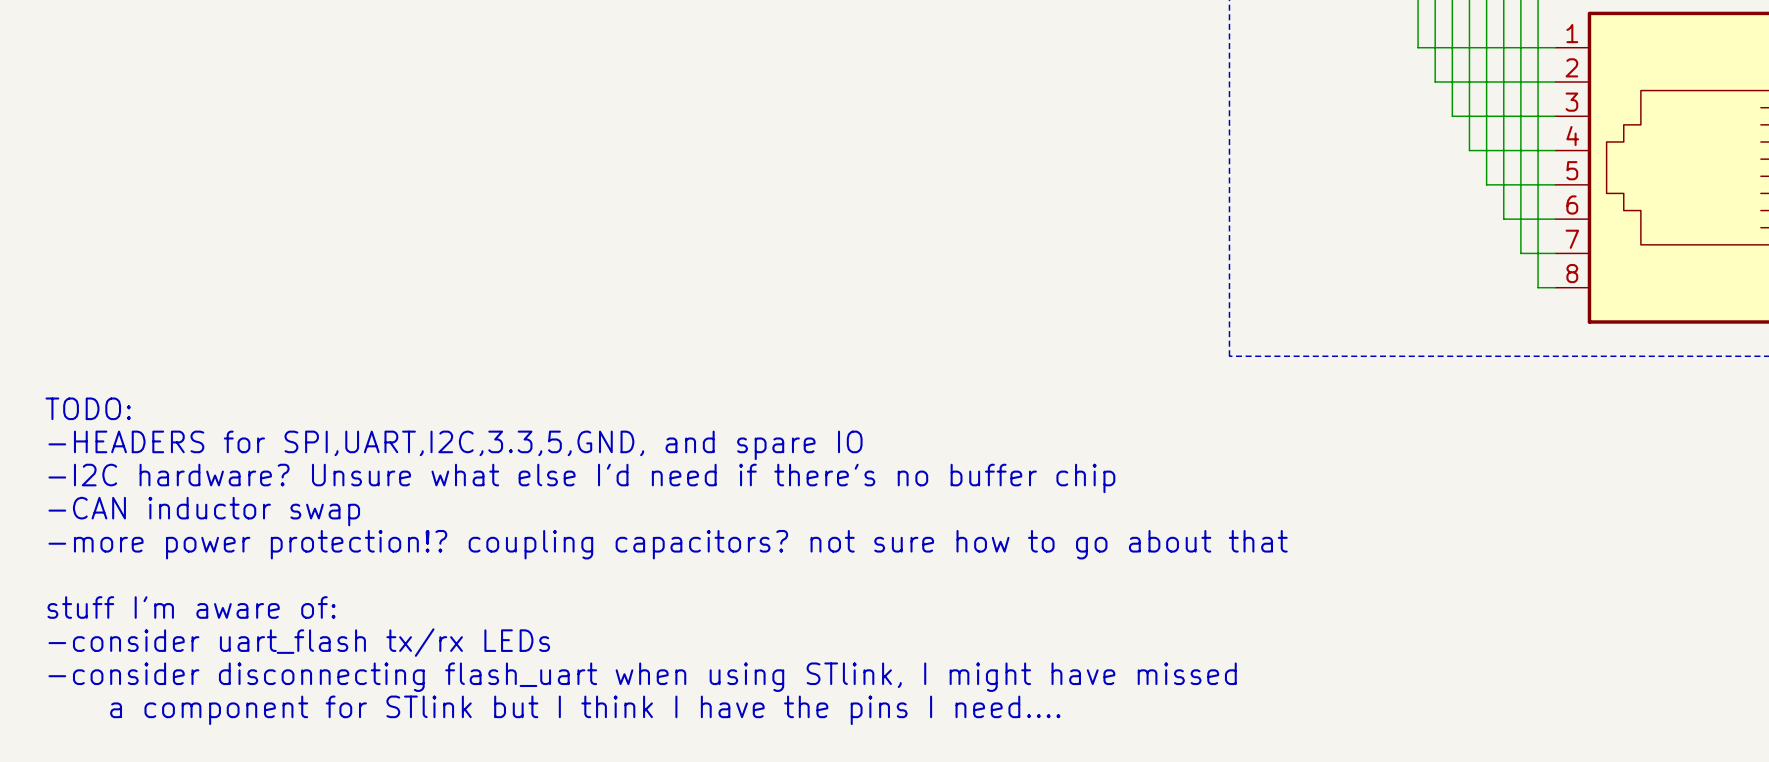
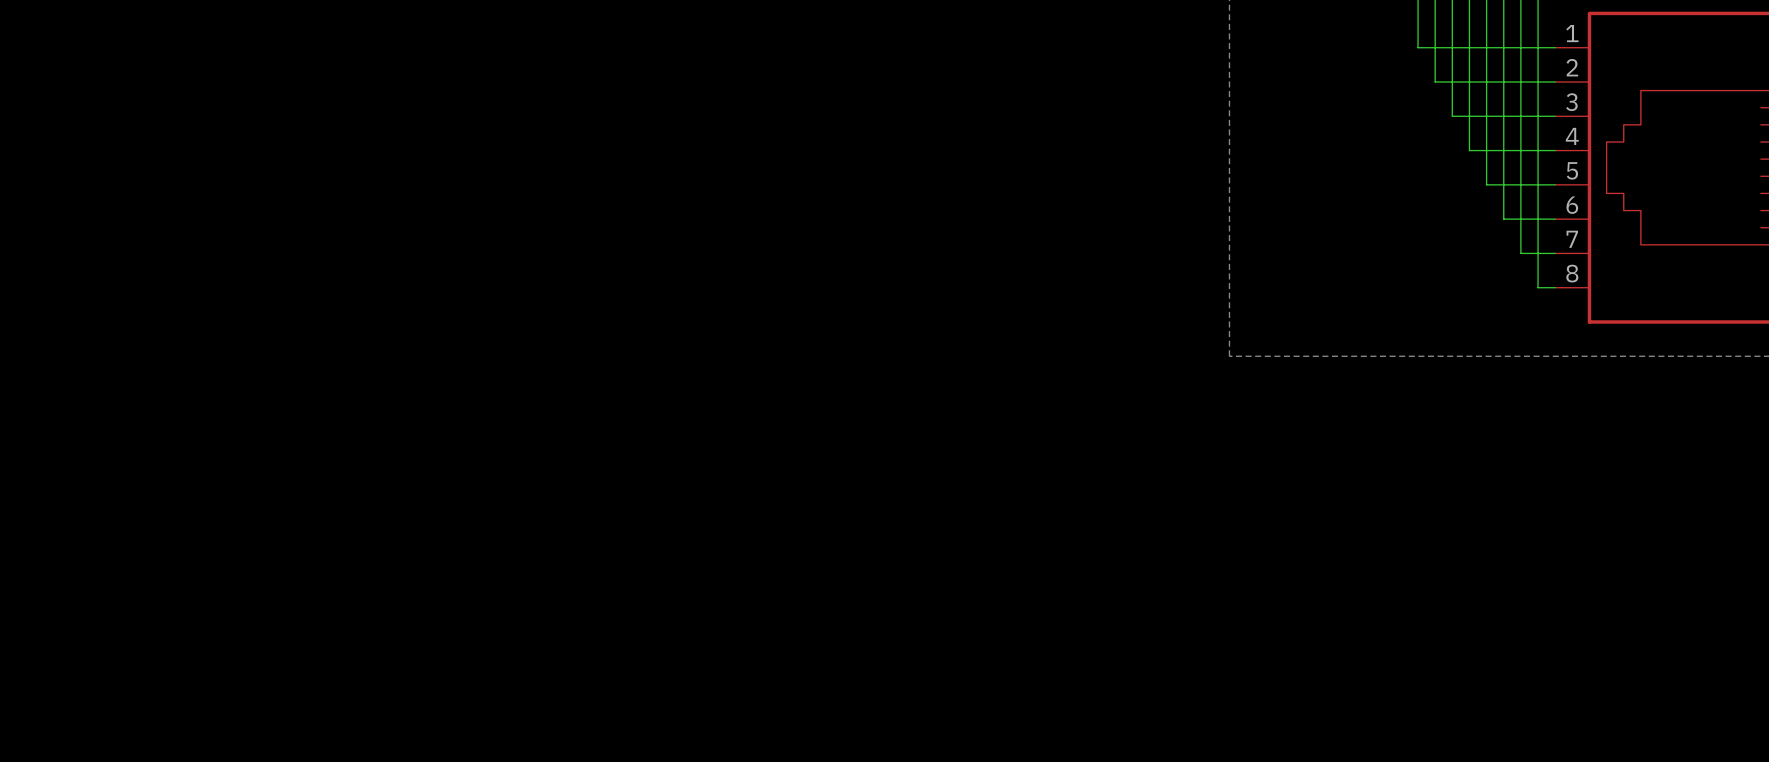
text: TODO: (88, 408) -> none
text: -HEADERS for SPI,UART,I2C,3.3,5,GND, and spare IO (455, 445) -> none
text: -I2C hardware? Unsure what else I'd need if there's no buffer chip (581, 478) -> none
text: -CAN inductor swap (204, 511) -> none
text: -more power protection!? coupling capacitors? not sure how to go about that (668, 544) -> none
text: stuff I'm aware of: (191, 607) -> none
text: -consider uart_flash tx/rx LEDs (299, 642) -> none
text: -consider disconnecting flash_uart when using STlink, I might have missed (642, 677) -> none
text: a component for STlink but I think I have the pins I need.... (585, 710) -> none

